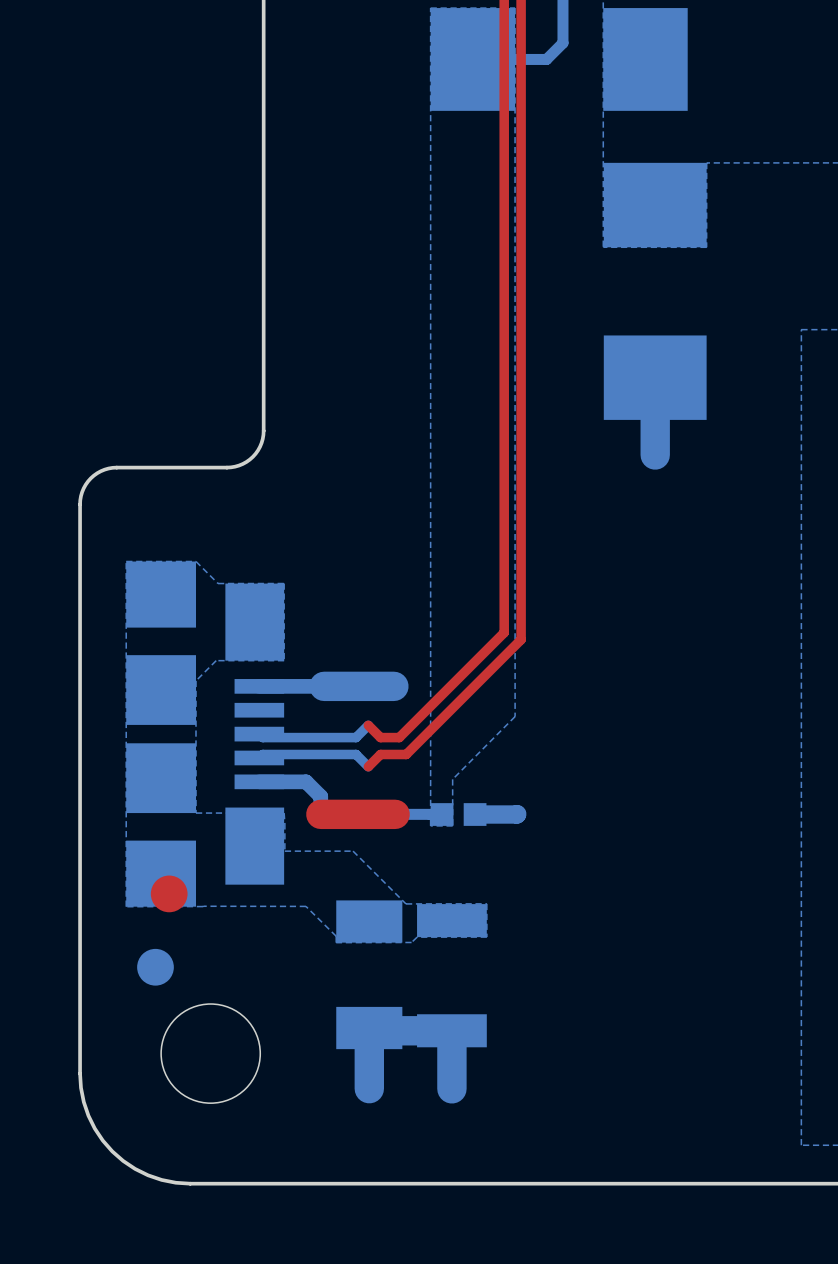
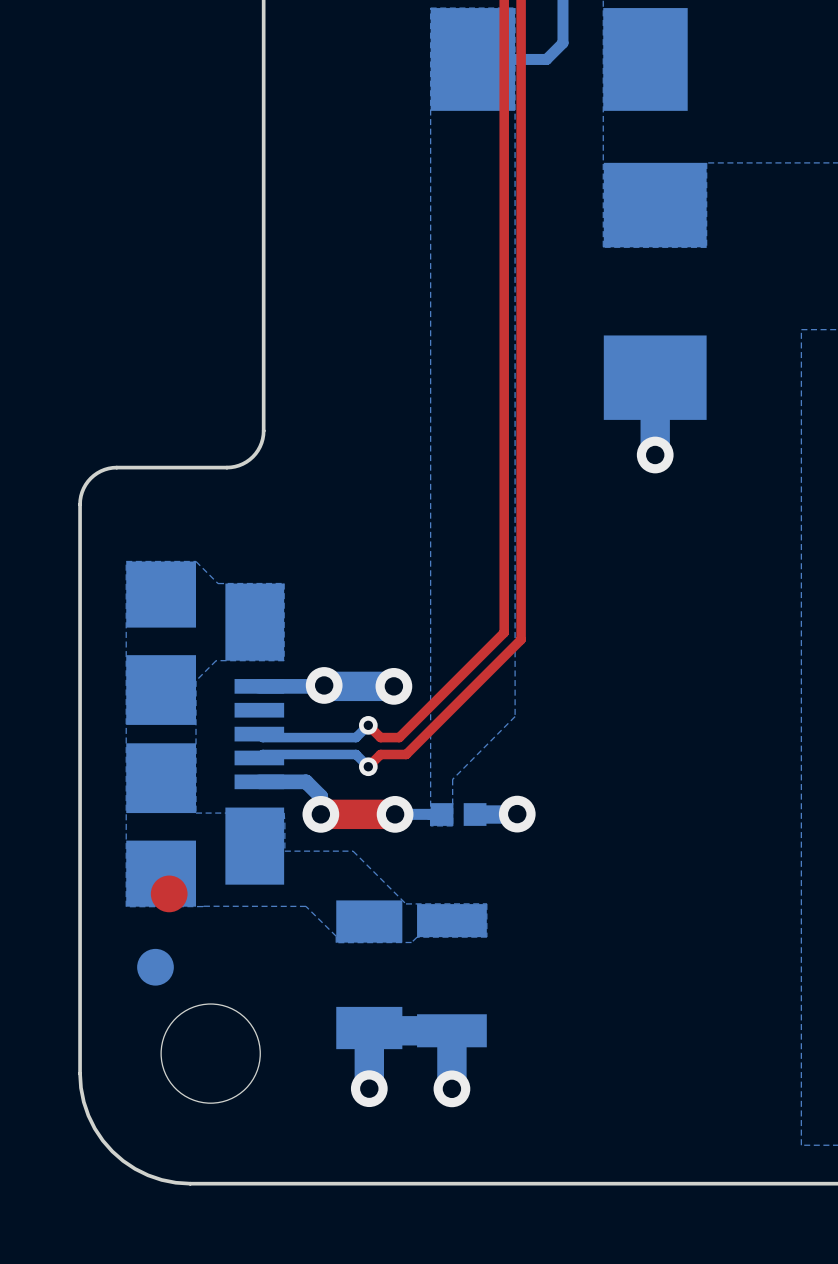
via: none -> (655, 454)
via: none -> (324, 685)
via: none -> (393, 686)
via: none -> (368, 725)
via: none -> (368, 766)
via: none -> (320, 814)
via: none -> (395, 814)
via: none -> (517, 814)
via: none -> (369, 1088)
via: none -> (451, 1088)

